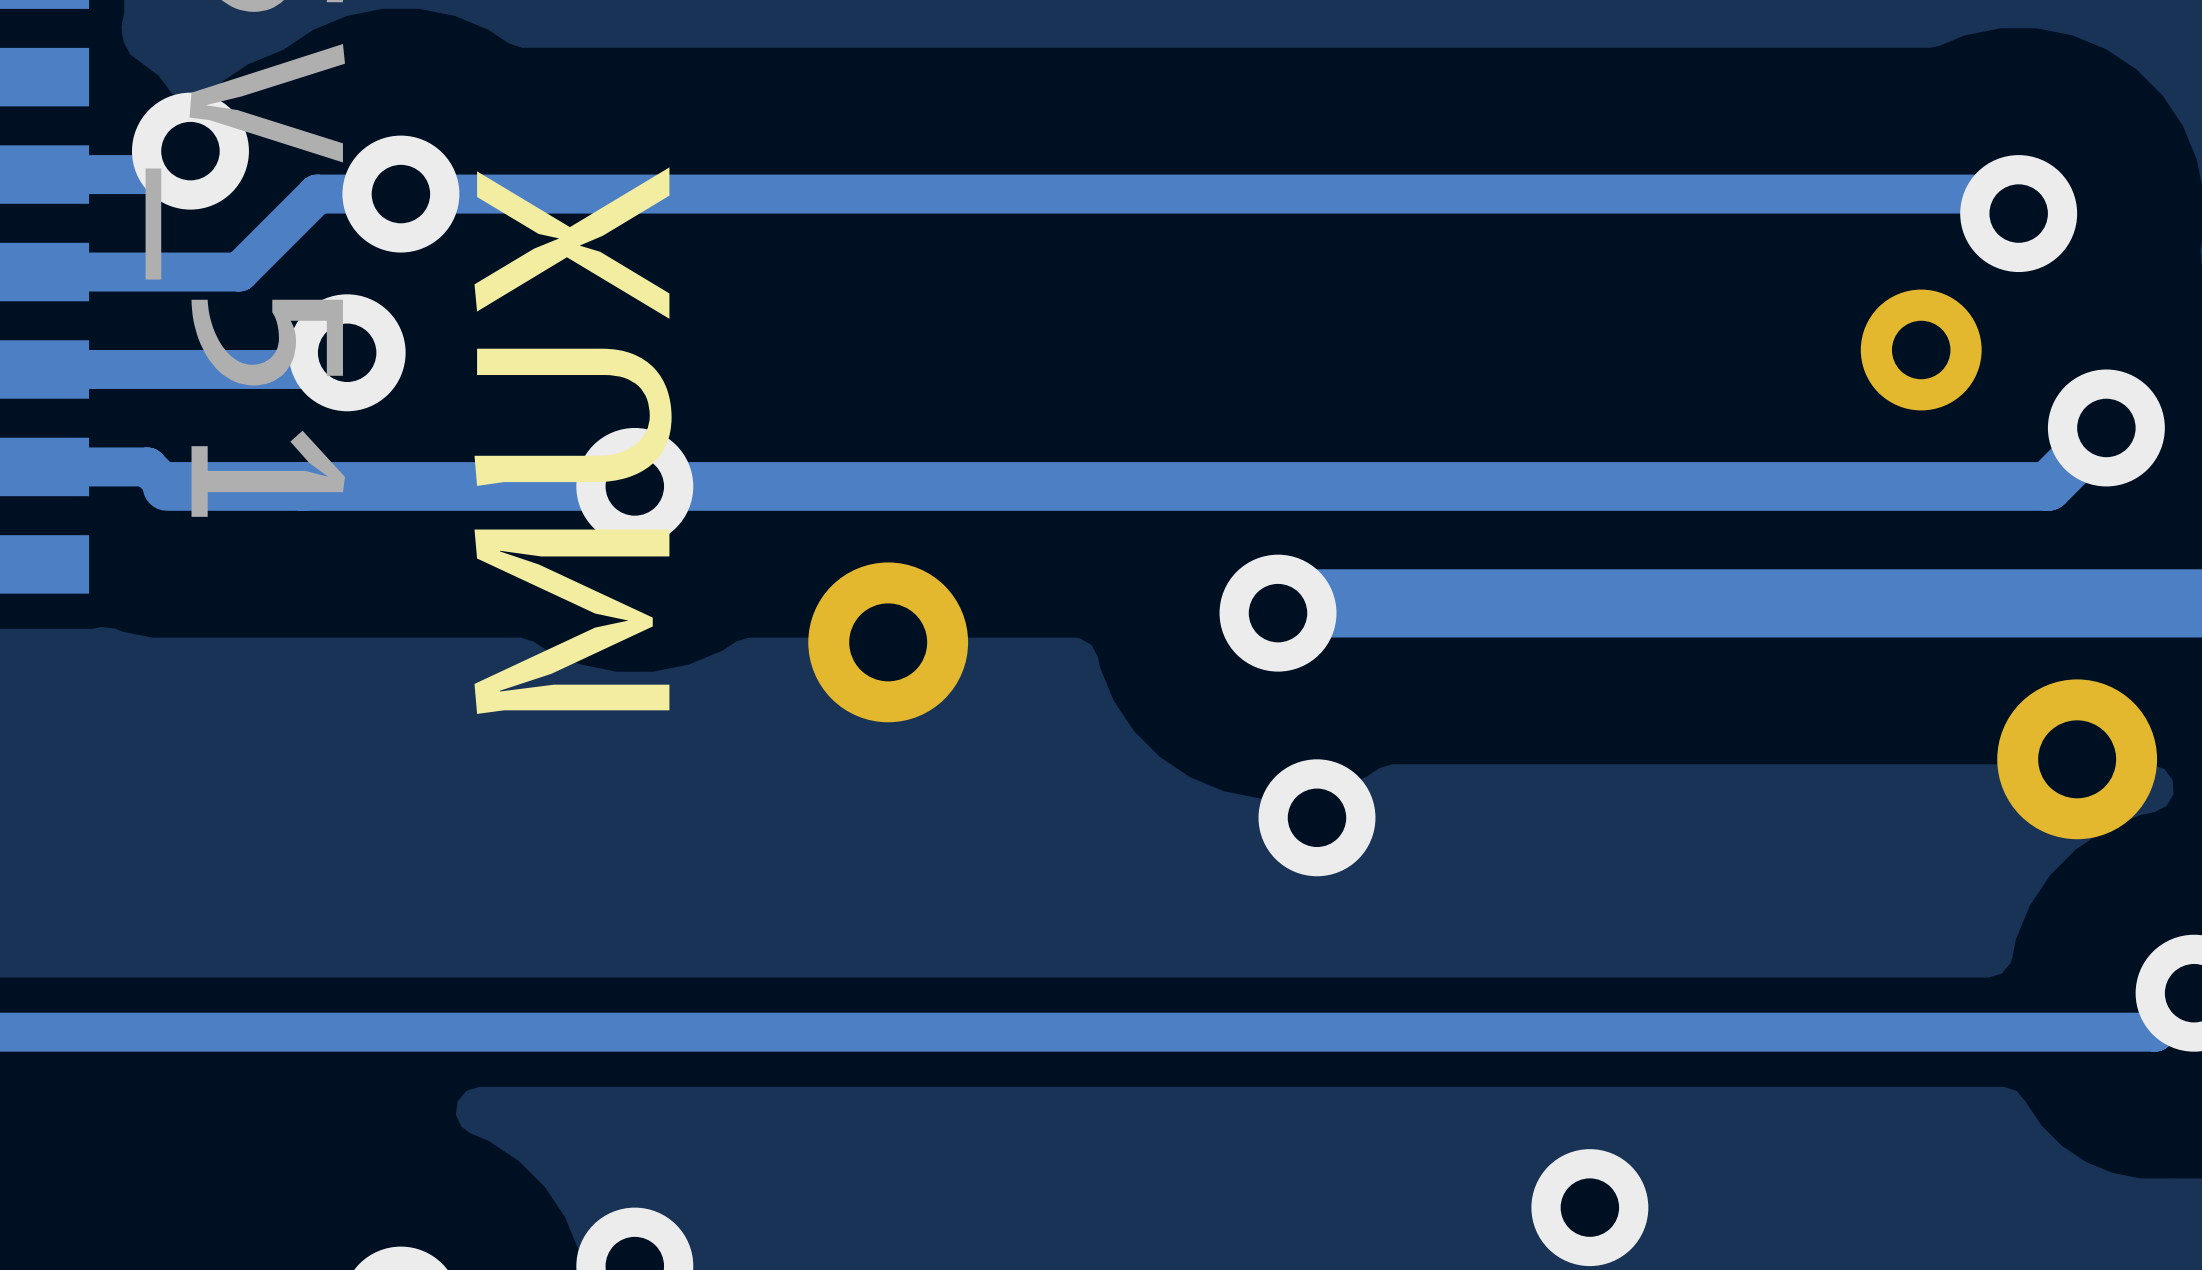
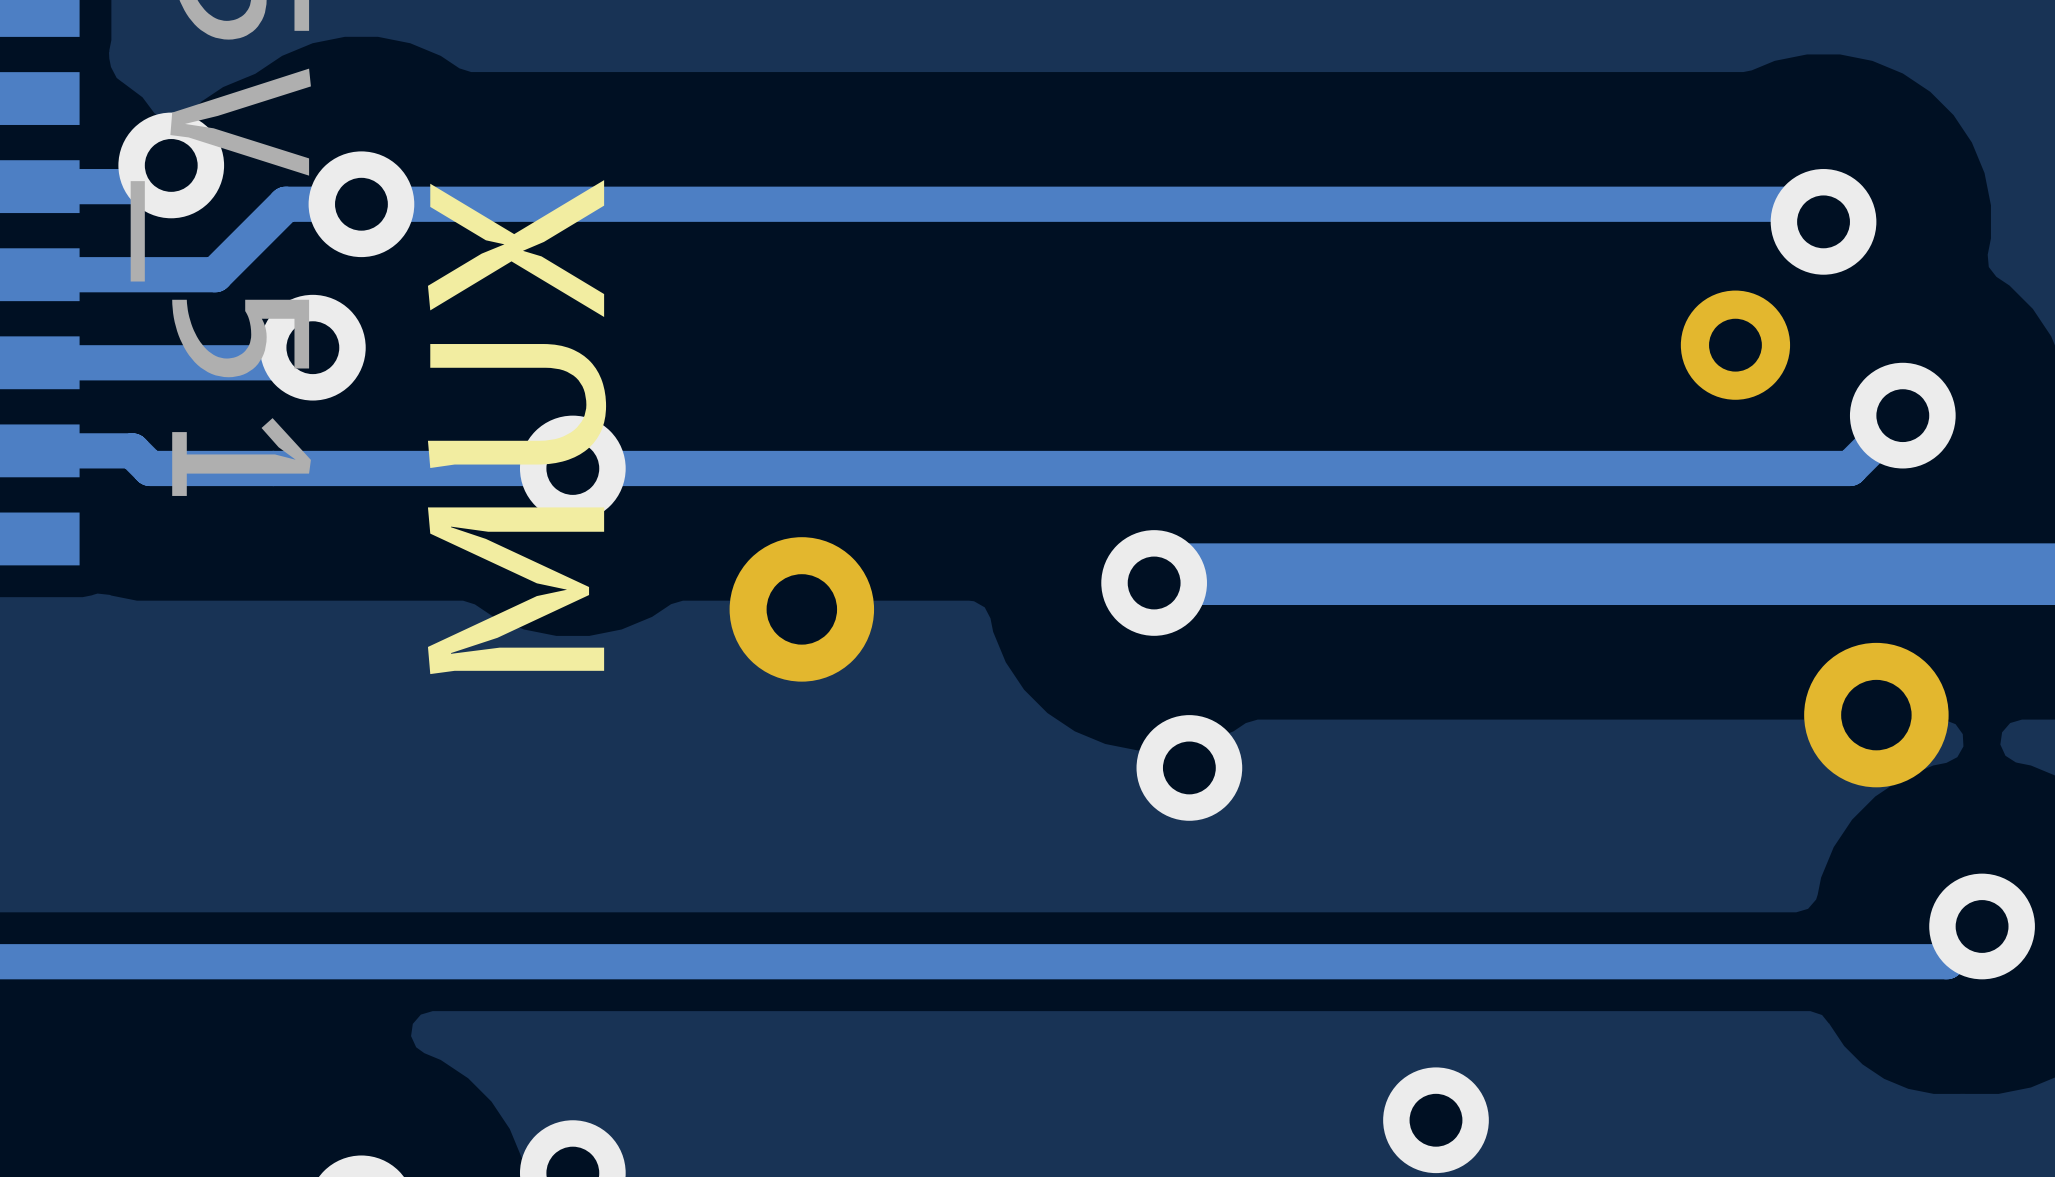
track width: thick (2106, 427) (2047, 486) (167, 486) -> thin (1902, 415) (1849, 468) (150, 468)

